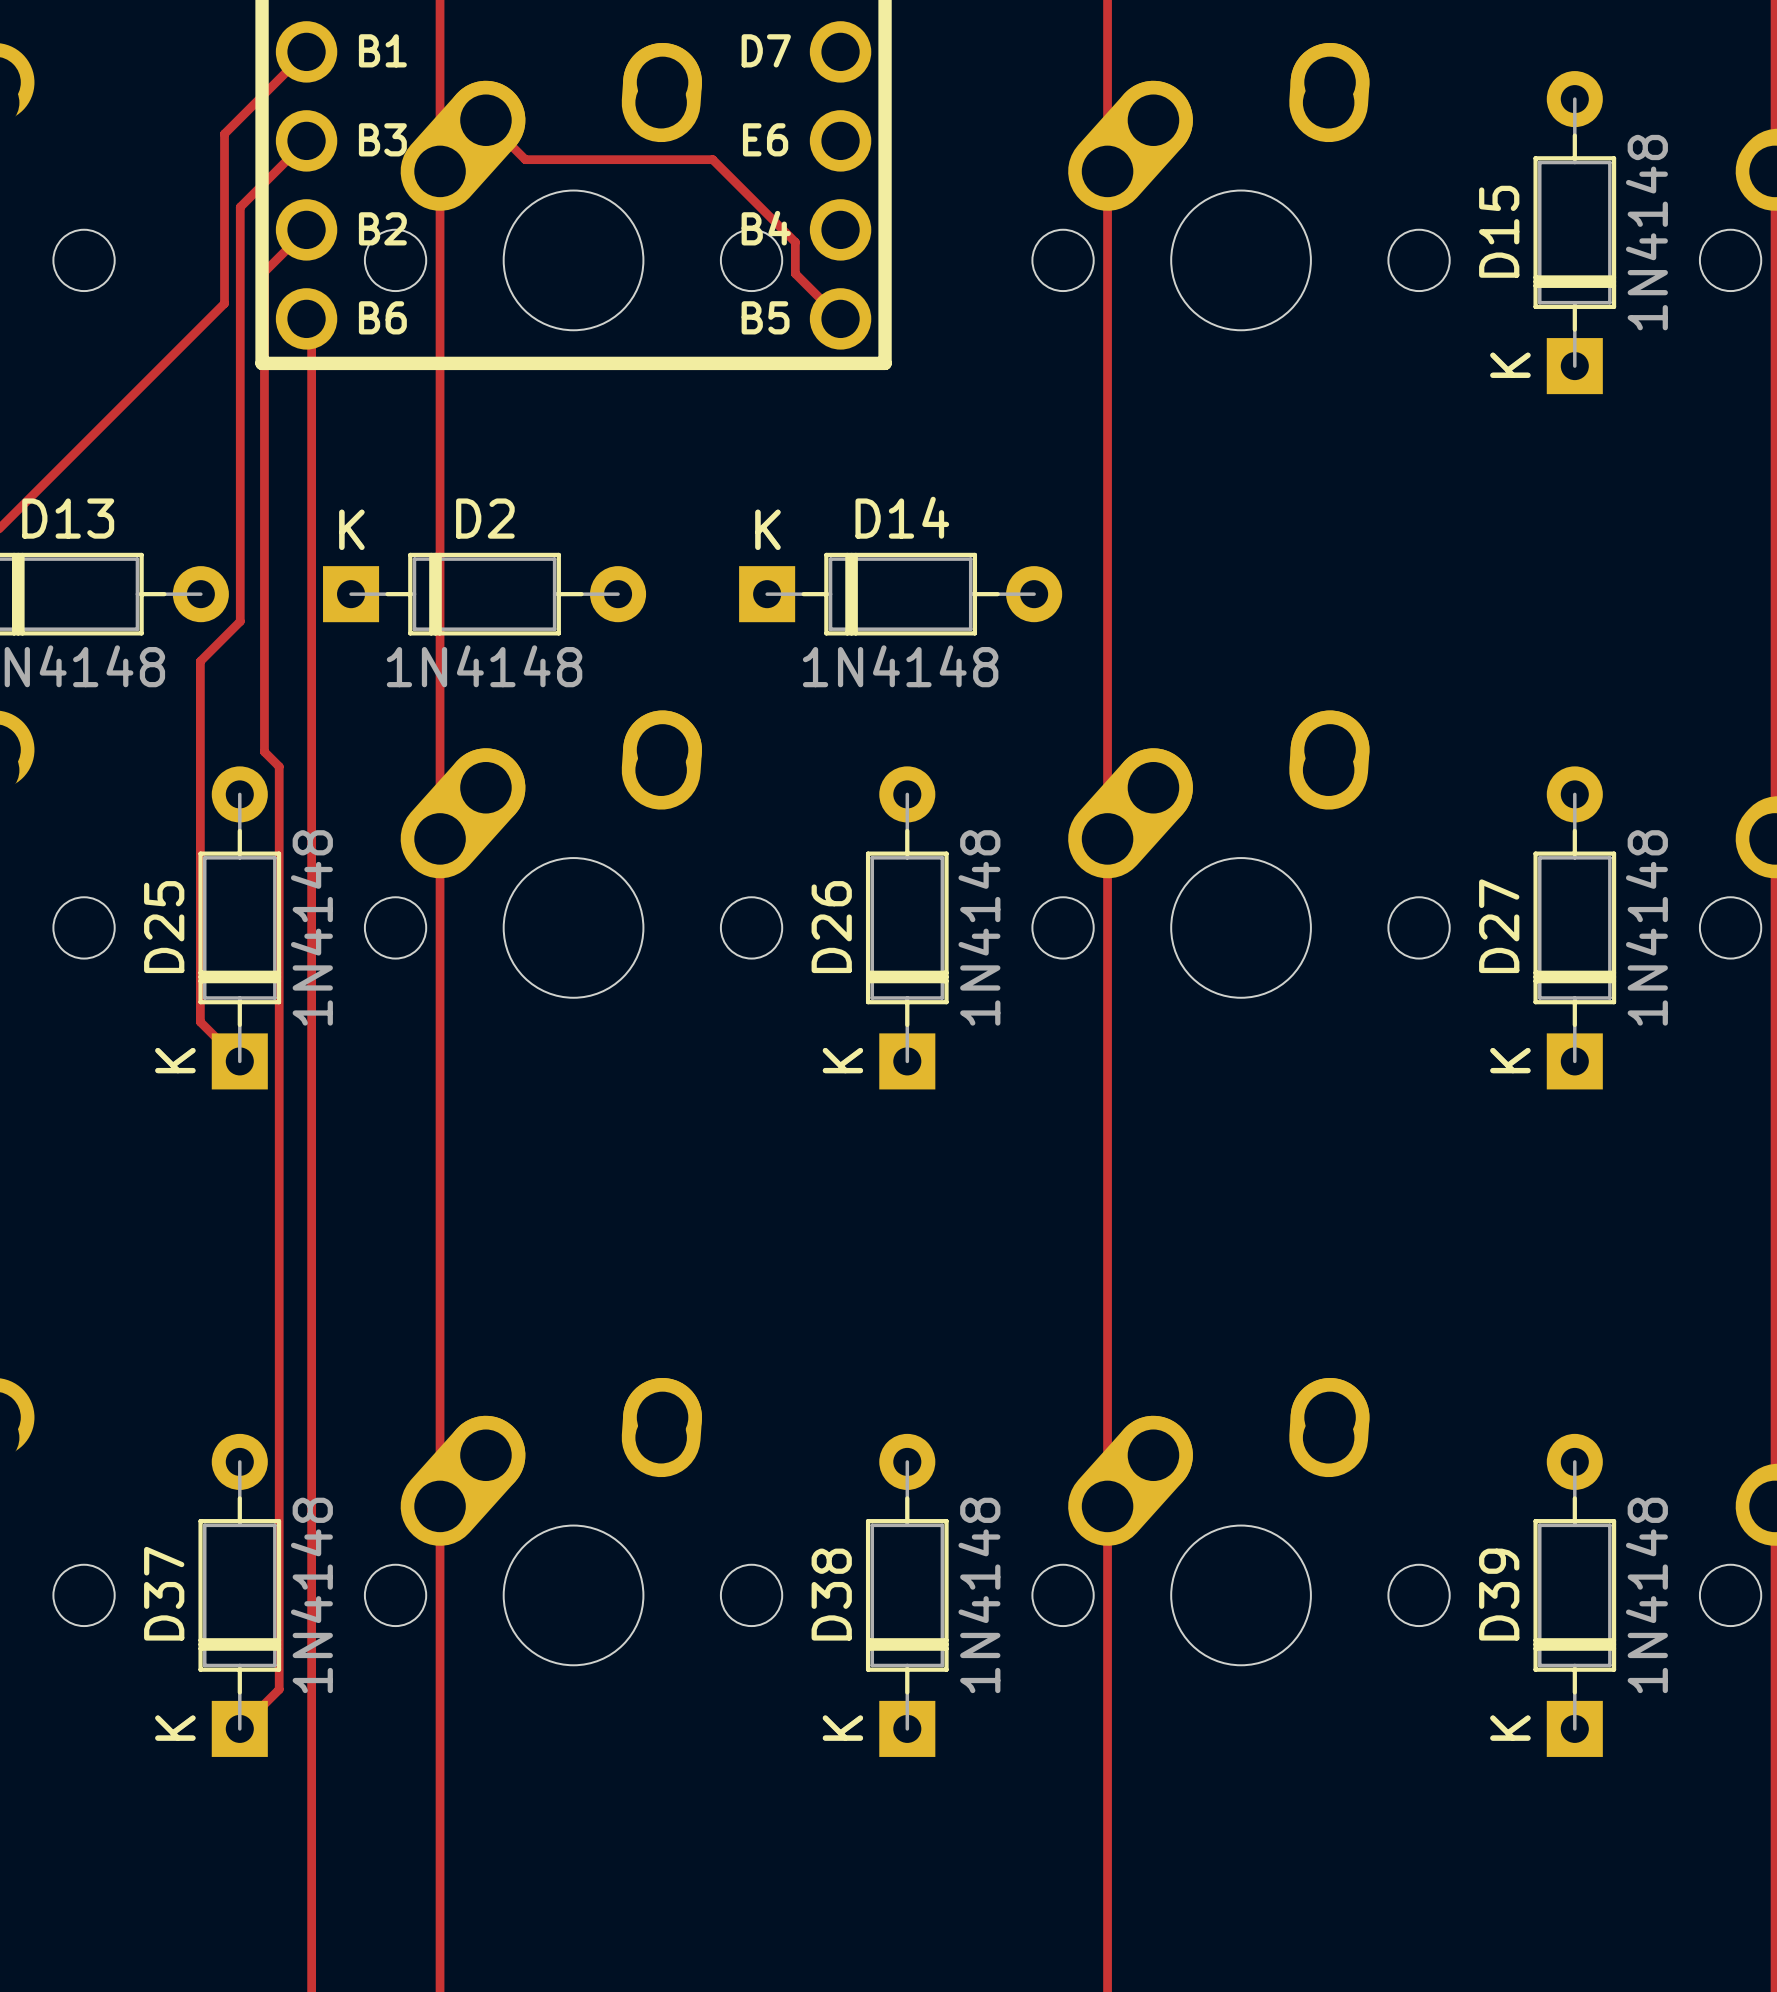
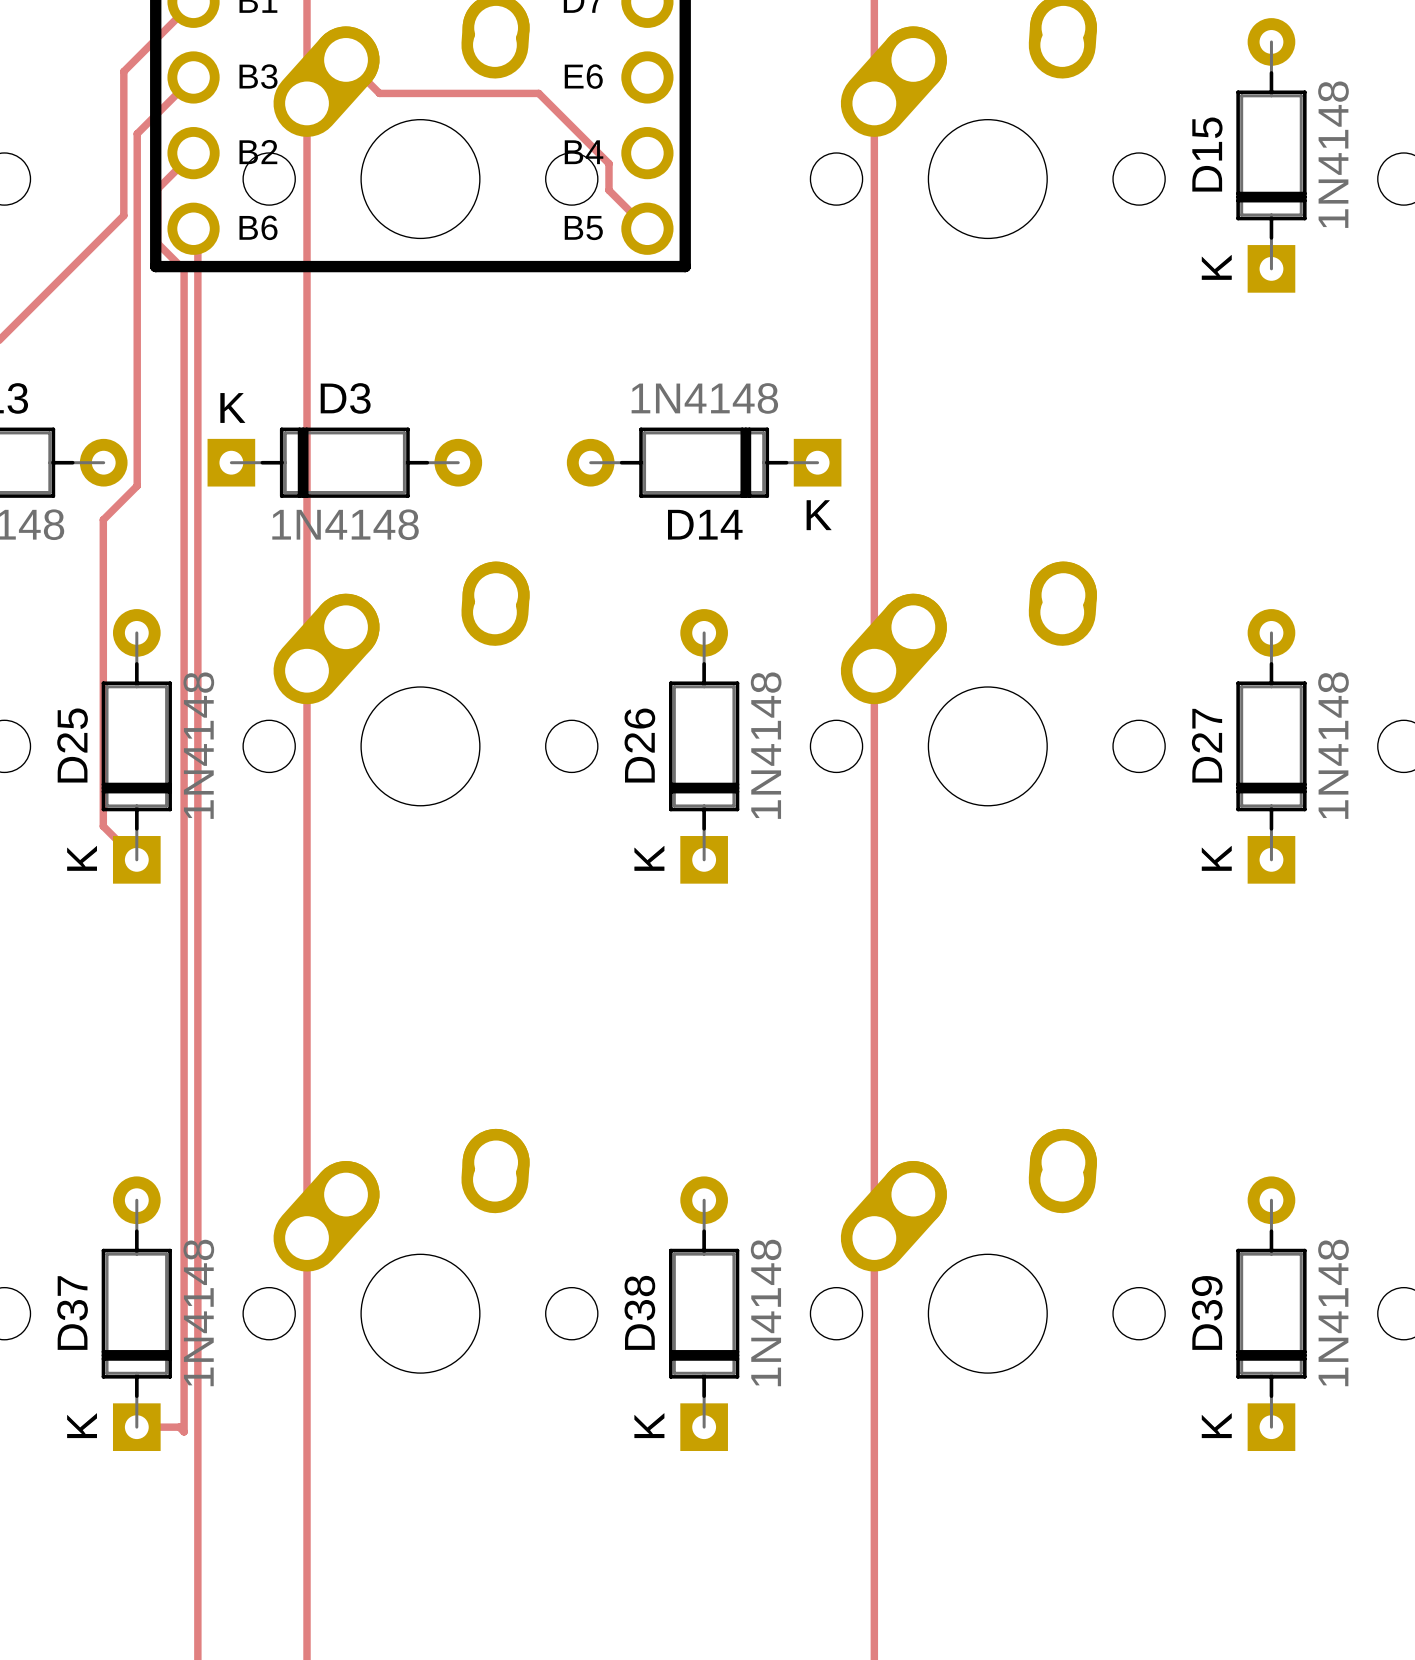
track: (264, 336) (264, 751) (279, 766) (279, 1689) (239, 1728) -> (157, 243) (184, 269) (184, 1431) (179, 1427) (136, 1427)
D2 name: D2 (485, 518) -> D3 (345, 398)
D14 rotation: 0° (900, 594) -> 180° (704, 462)

